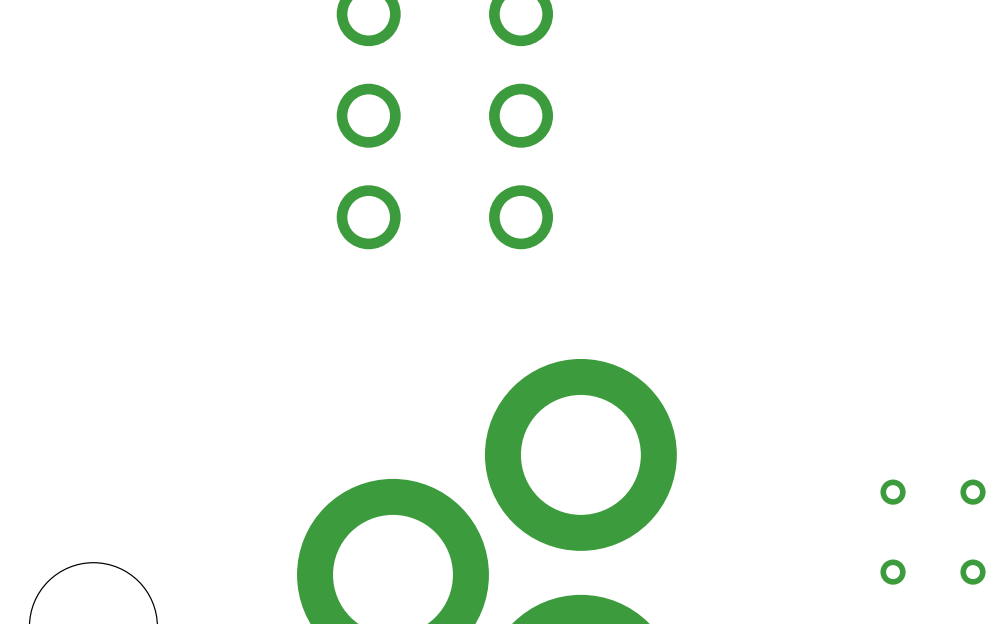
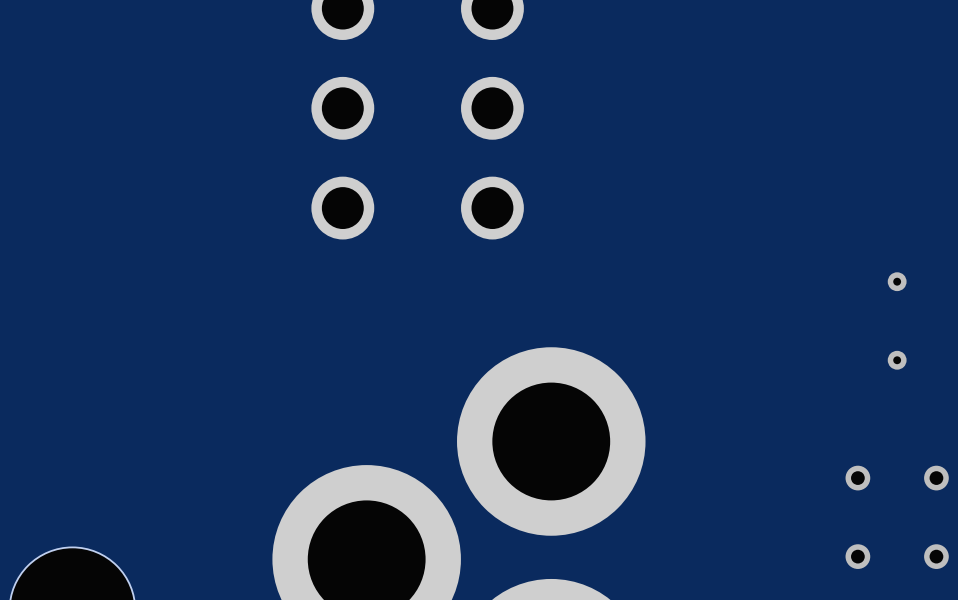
via: none -> (897, 281)
via: none -> (897, 360)

